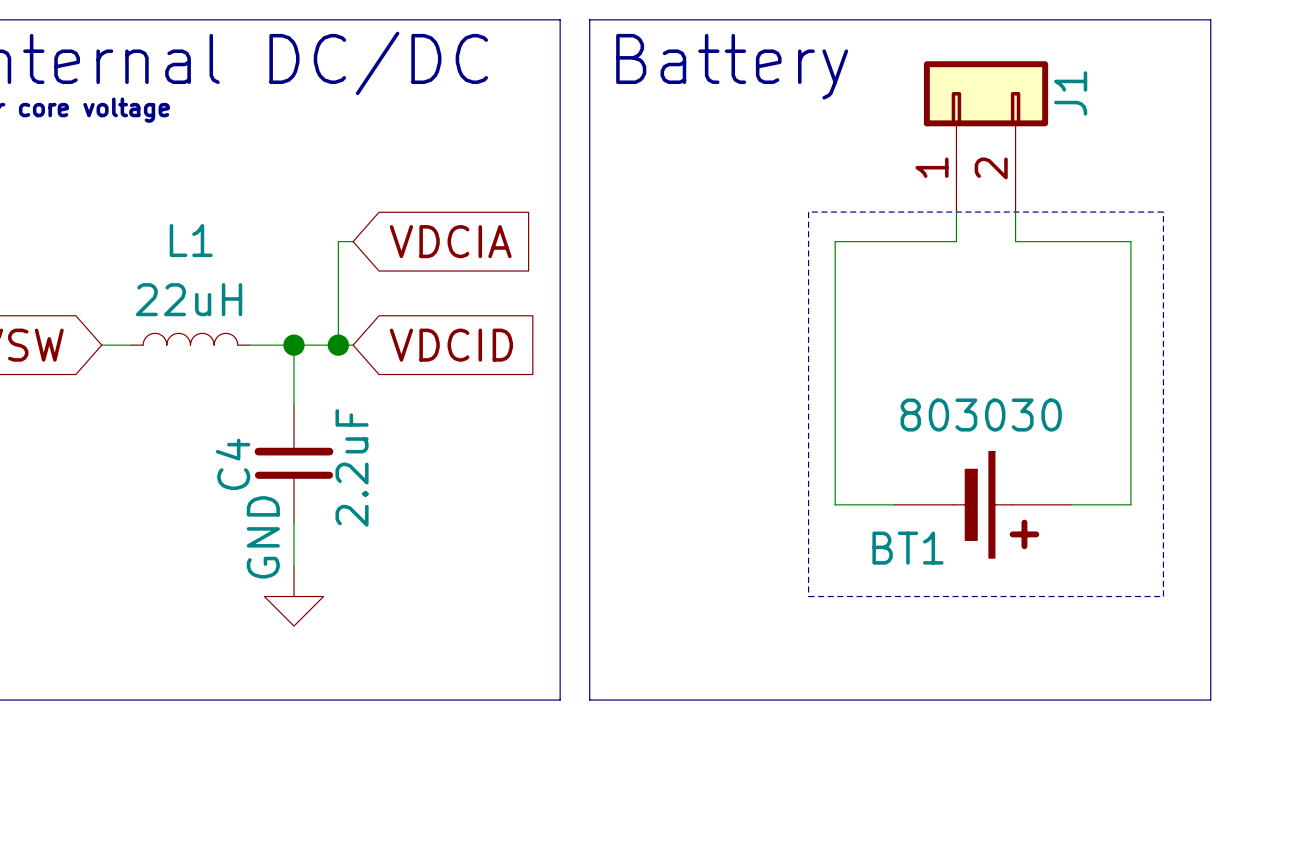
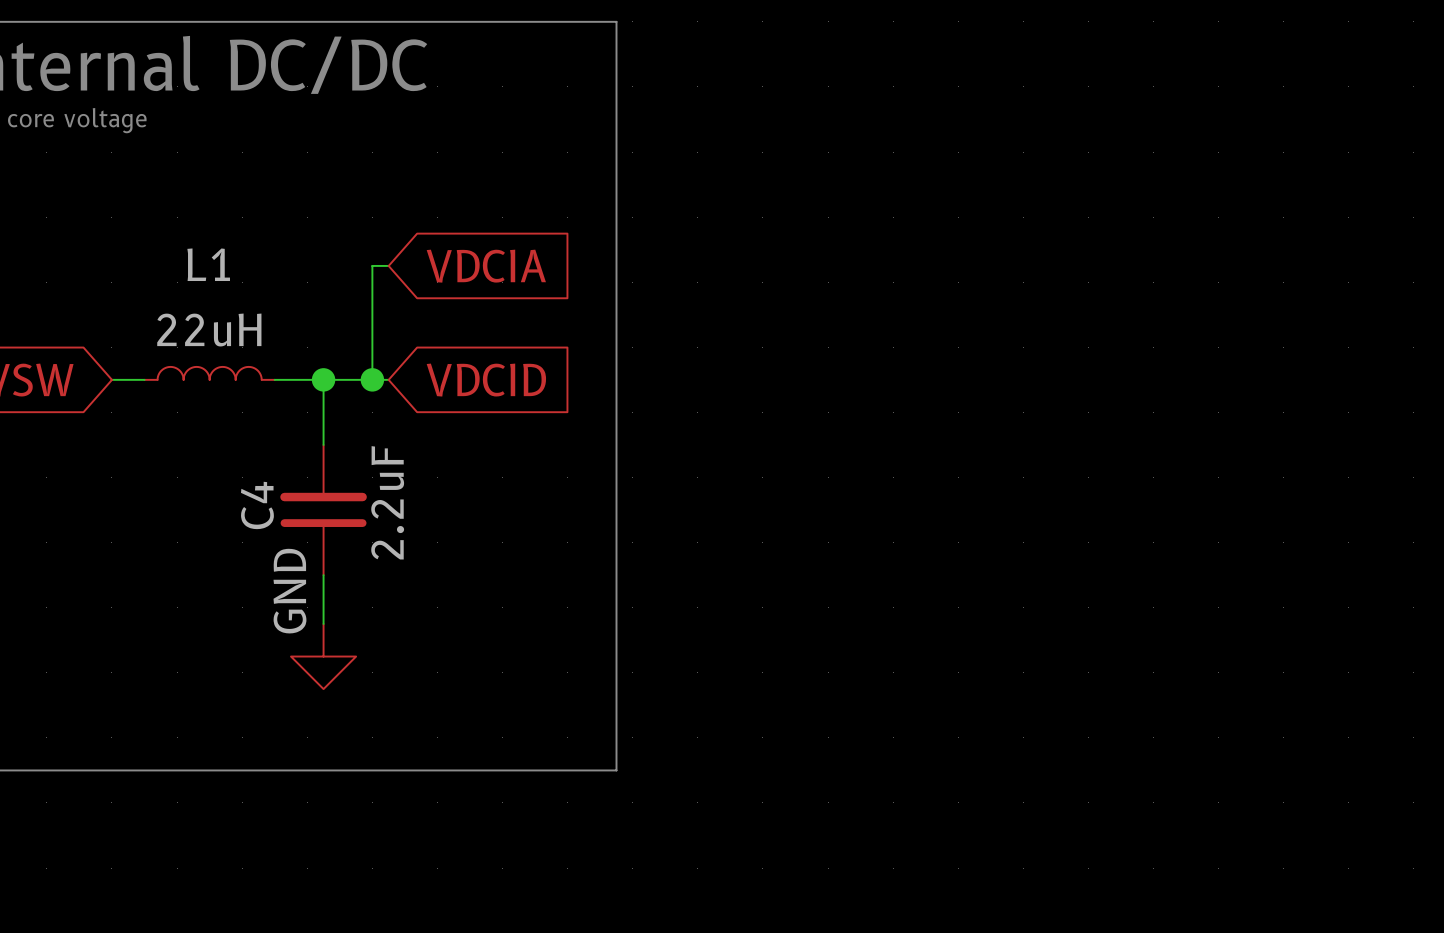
line: (589, 19) (589, 700) (1210, 700) (1210, 19) (589, 19) -> none
text: Battery (732, 66) -> none
J1: (986, 136) -> none
line: (808, 212) (1163, 212) (1163, 596) (808, 596) (808, 212) -> none
wire: (956, 212) (956, 241) (835, 241) (835, 504) (894, 504) -> none
wire: (1015, 212) (1015, 241) (1130, 241) (1130, 504) (1071, 504) -> none
BT1: 803030 (983, 504) -> none

